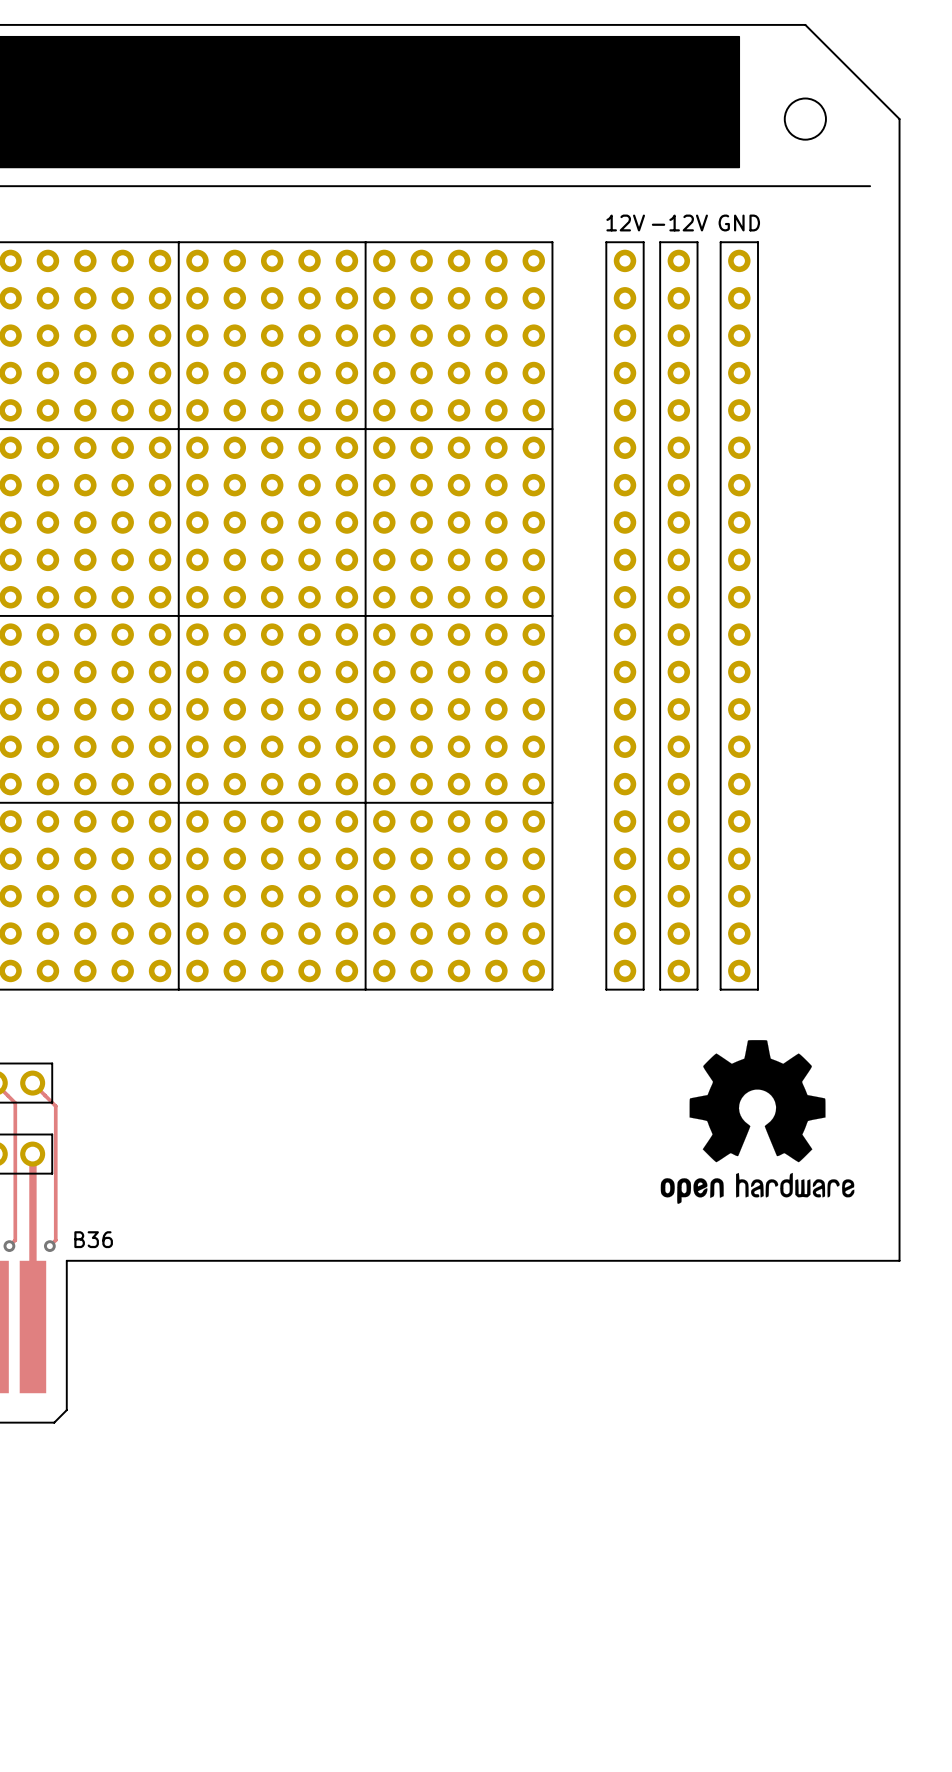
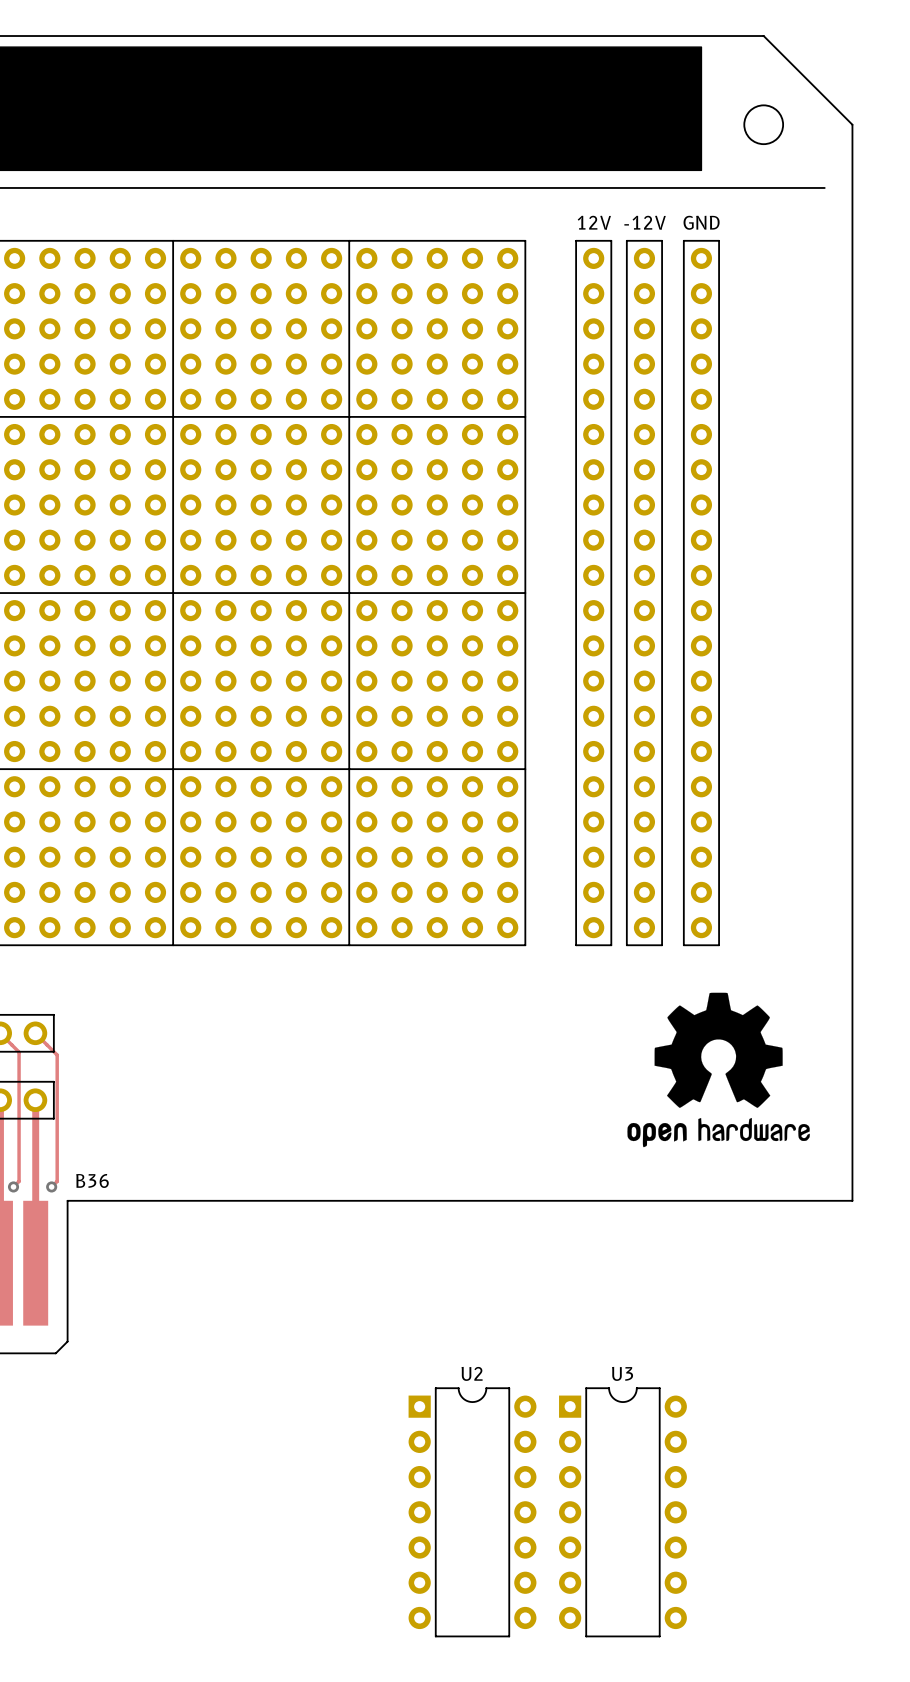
U2: none -> (472, 1512)
U3: none -> (622, 1512)

